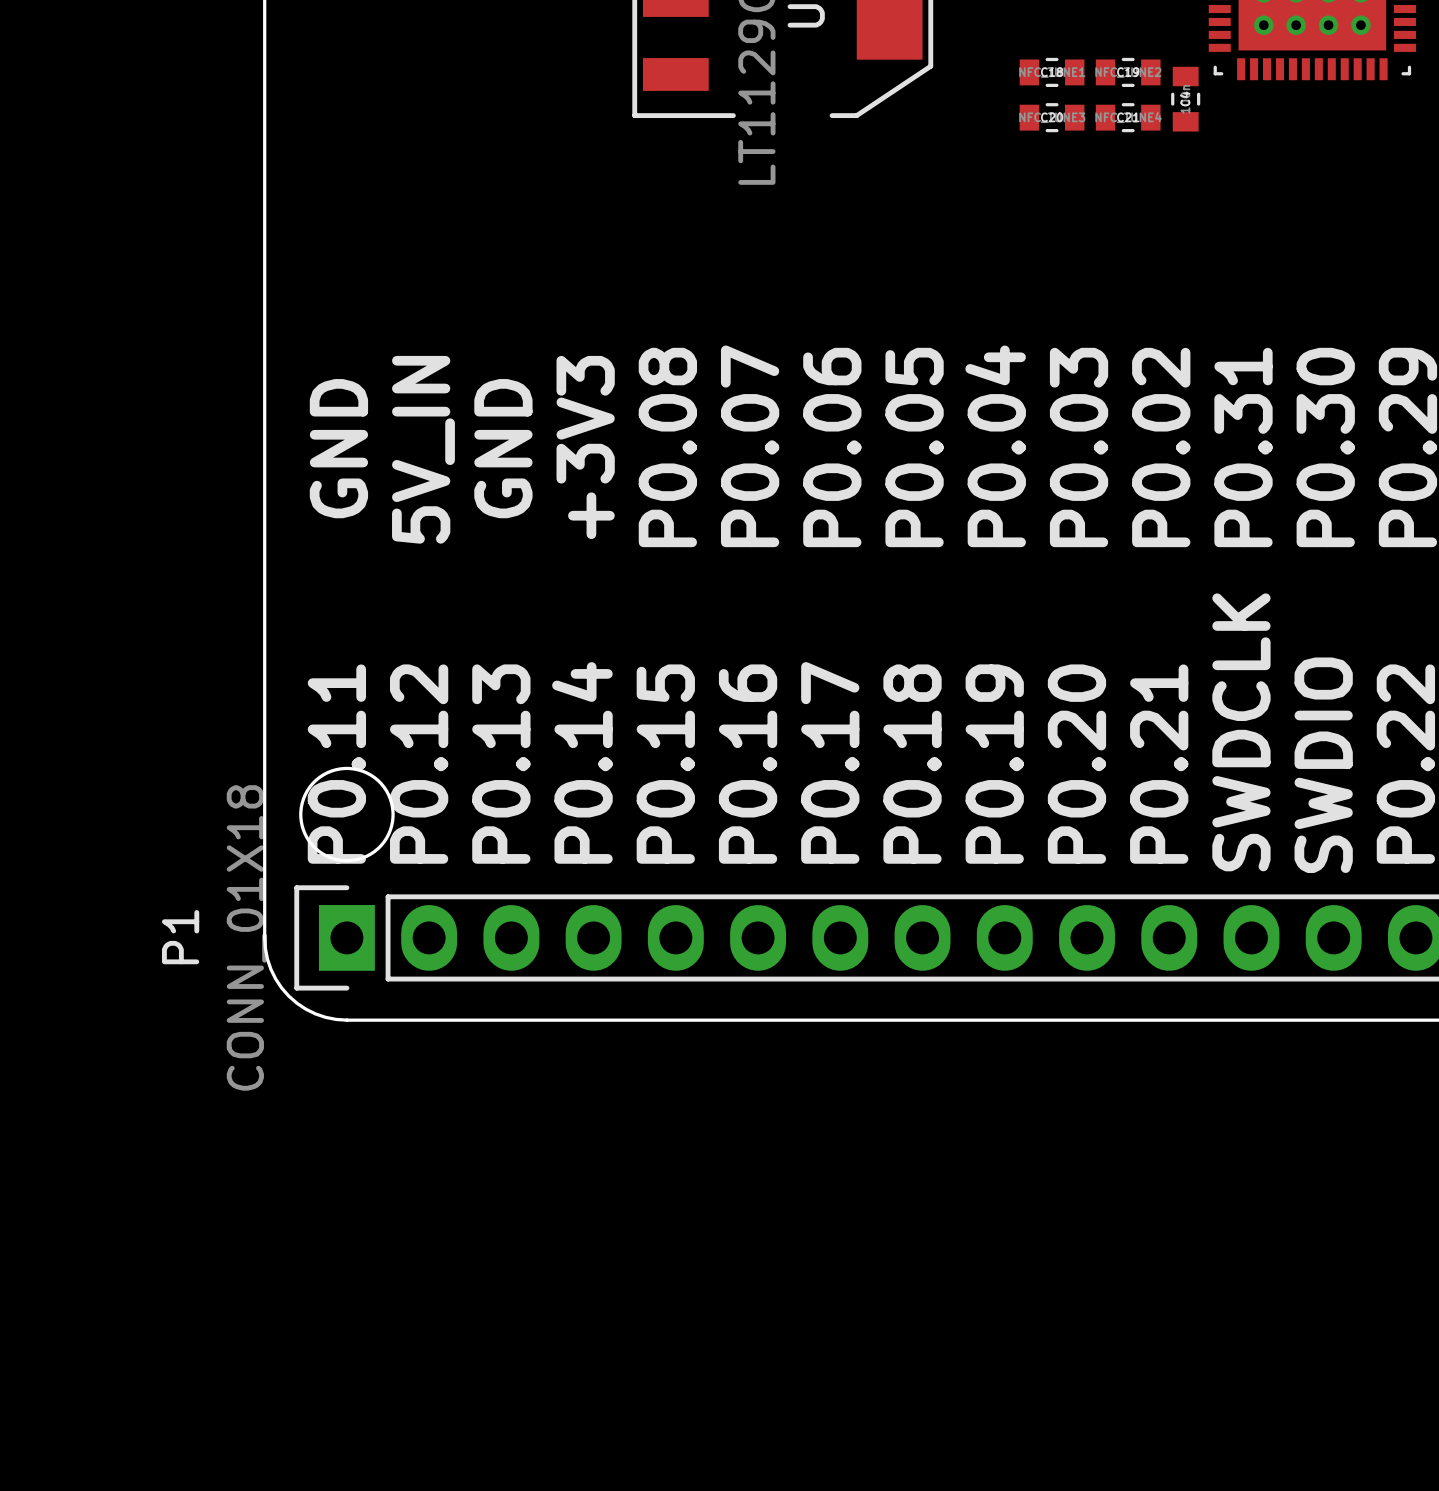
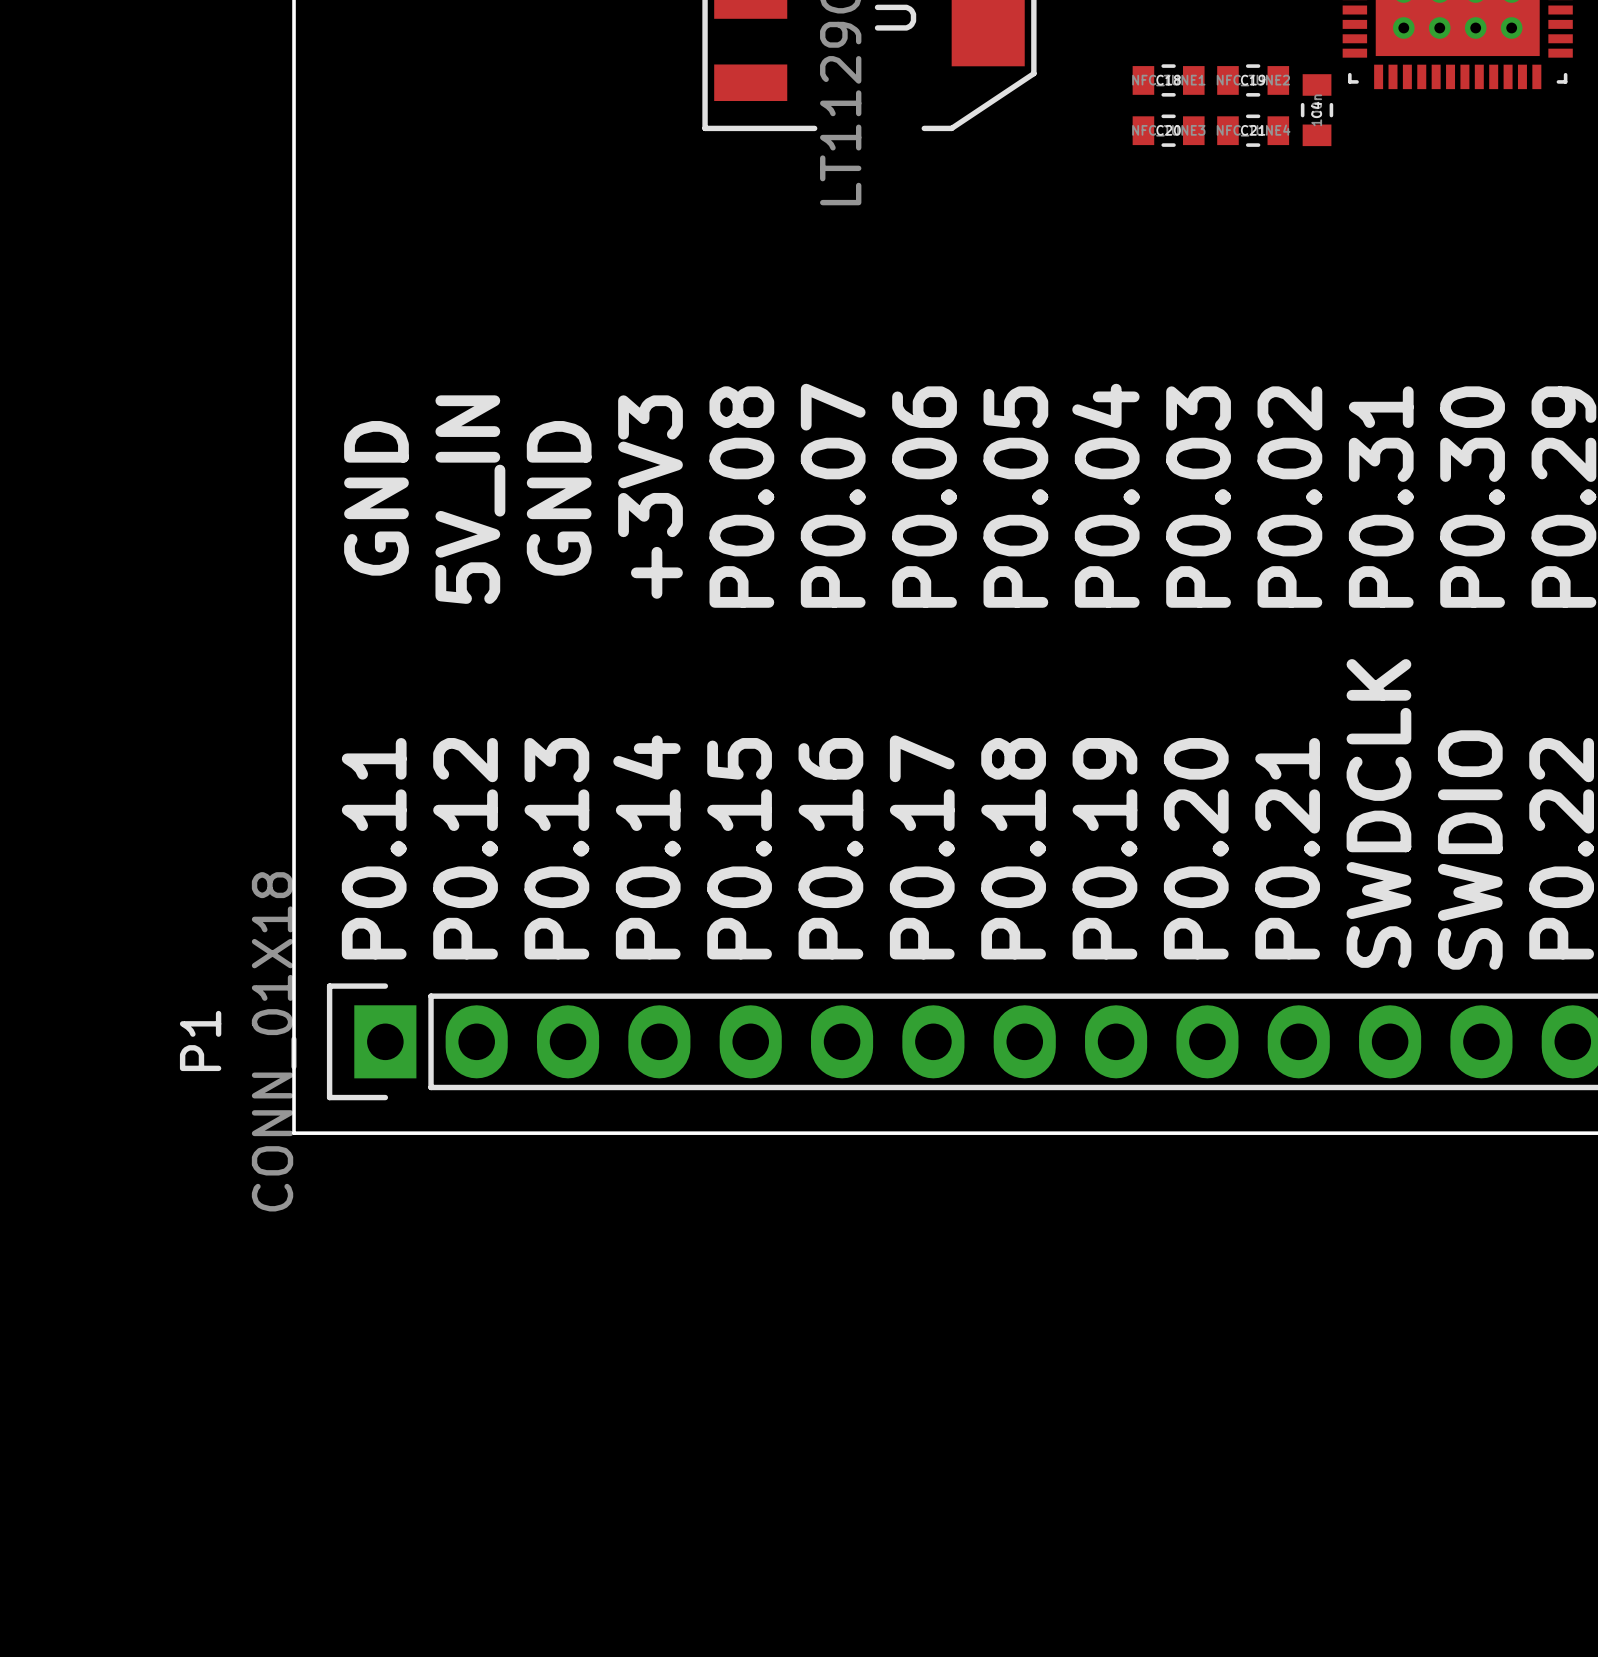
round board edge: [299, 766, 395, 863] -> none
board edge: (264, 937) (270, 969) (288, 996) (315, 1013) (346, 1020) -> (294, 1041) (294, 1133) (385, 1133)

